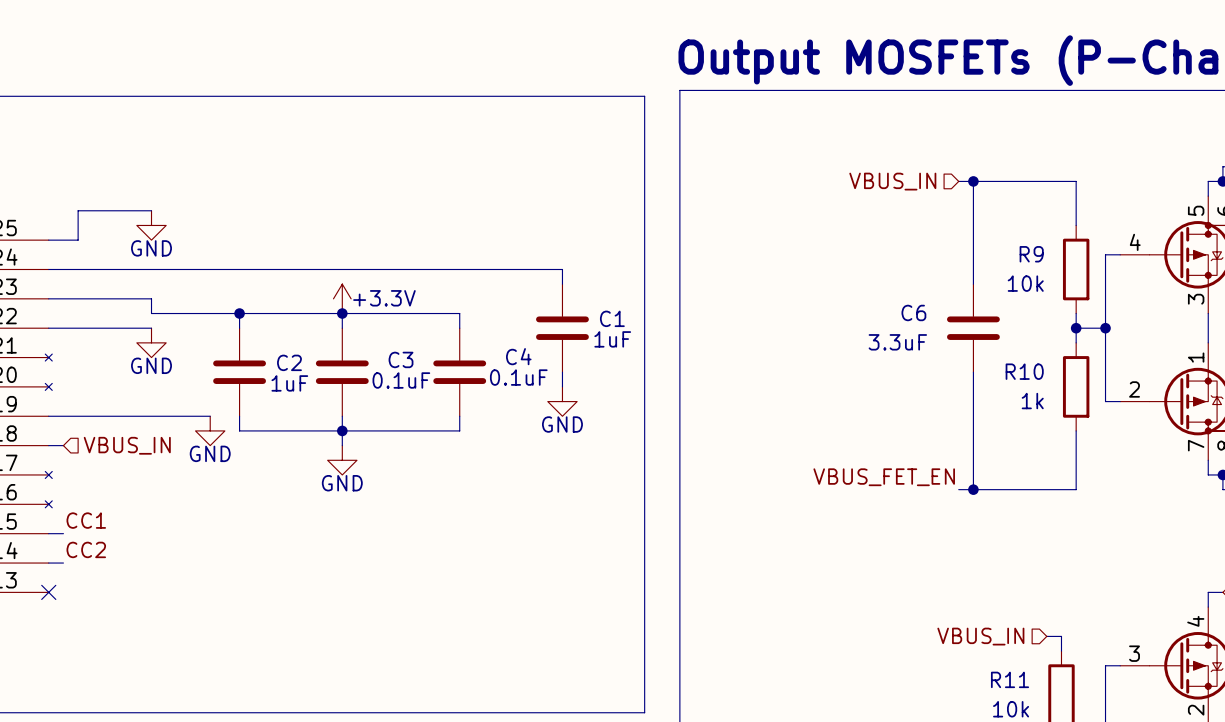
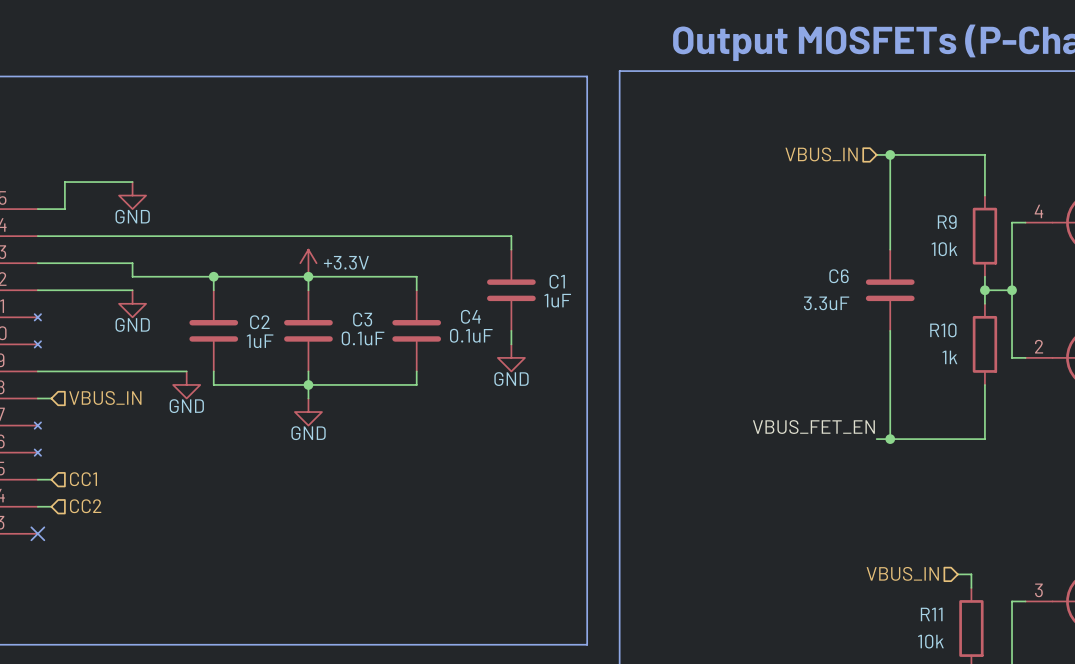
label: CC1 (86, 520) -> none
hierarchical label: none -> CC1 (83, 479)
label: CC2 (86, 549) -> none
hierarchical label: none -> CC2 (85, 506)

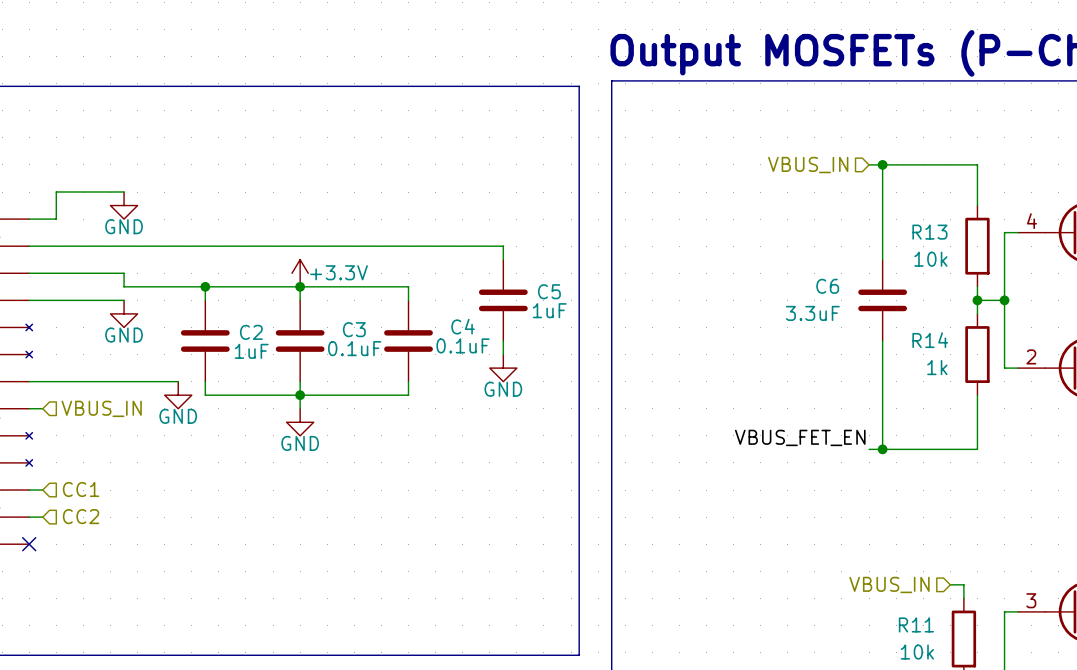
R9 name: R9 (947, 222) -> R13 (929, 232)
C1 name: C1 (557, 281) -> C5 (549, 291)
R10 name: R10 (943, 330) -> R14 (930, 340)

